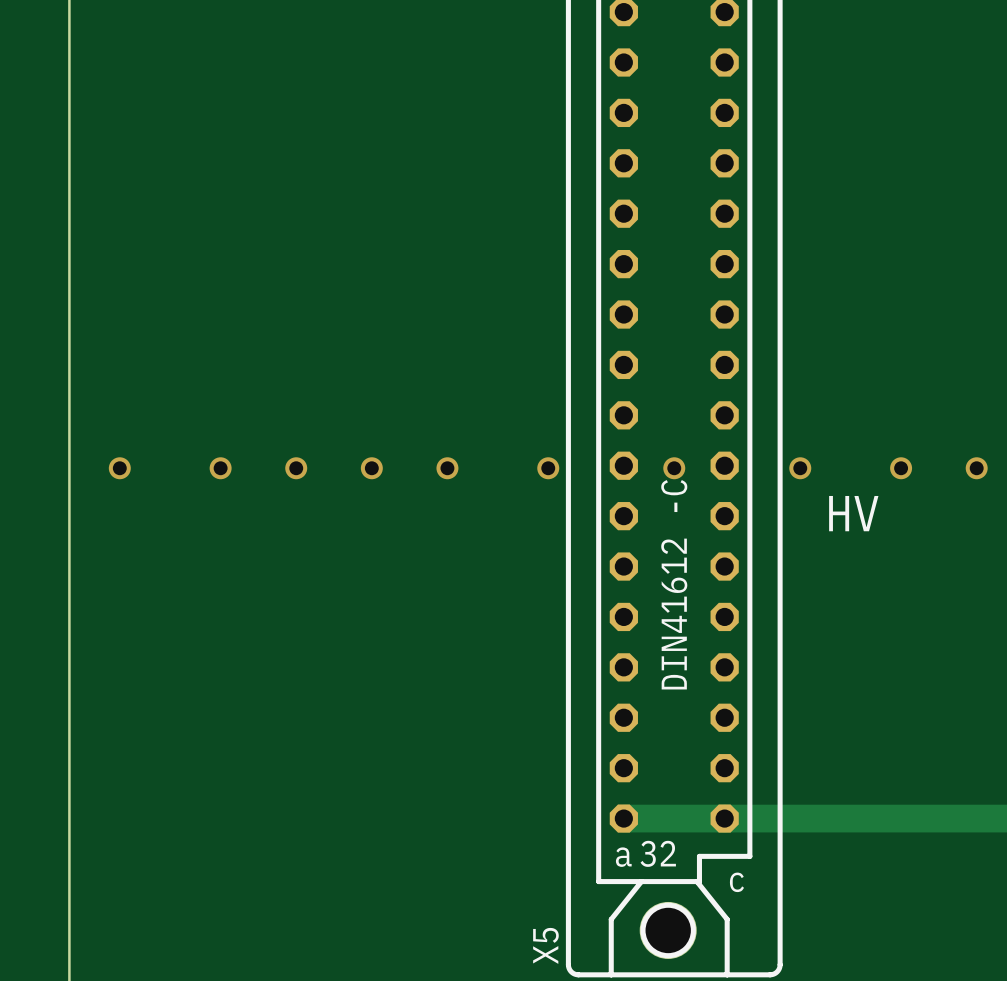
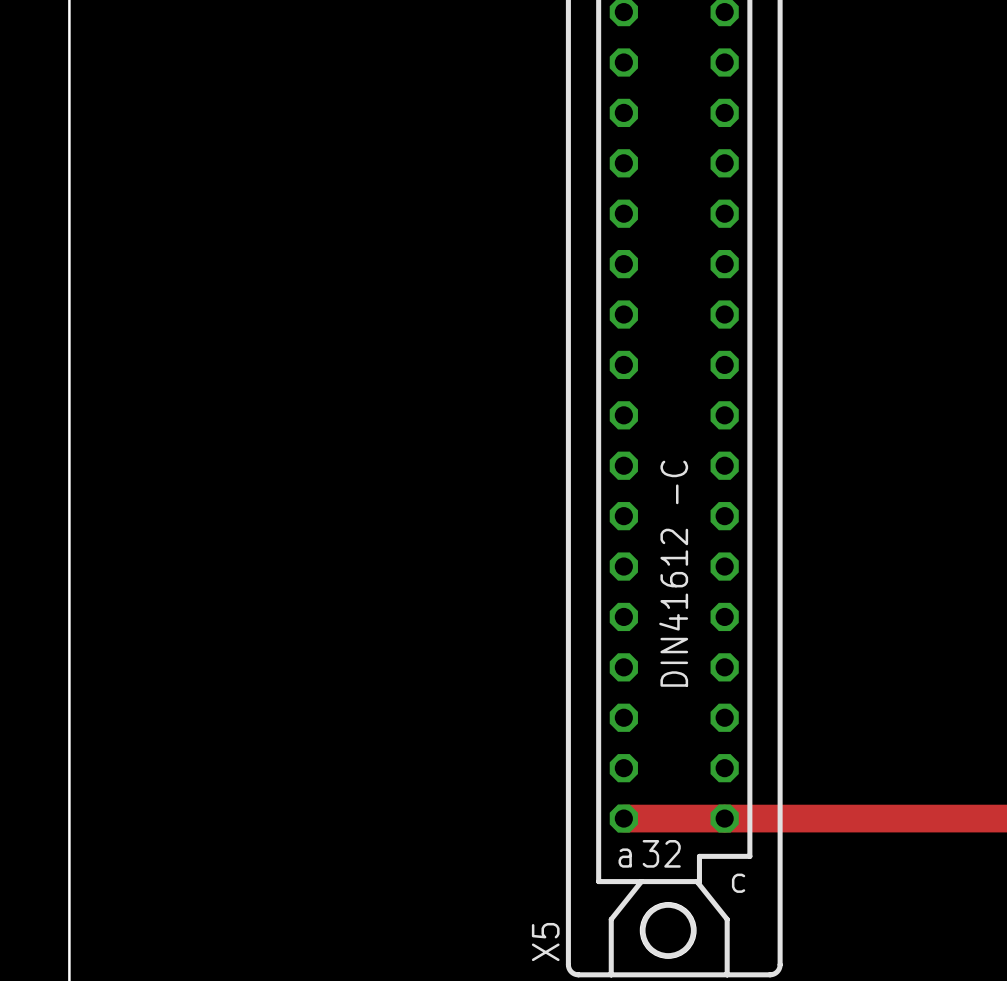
via: (119, 468) -> none
via: (220, 468) -> none
via: (296, 468) -> none
via: (371, 468) -> none
via: (447, 468) -> none
via: (548, 468) -> none
via: (674, 468) -> none
via: (800, 468) -> none
via: (901, 468) -> none
via: (976, 468) -> none
text: HV (853, 513) -> none

